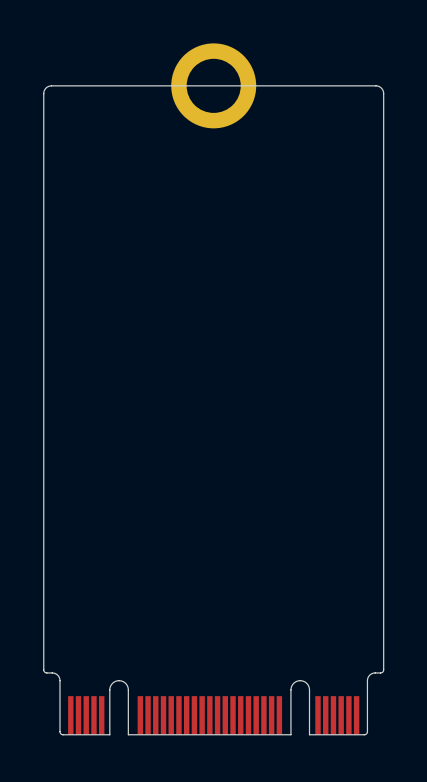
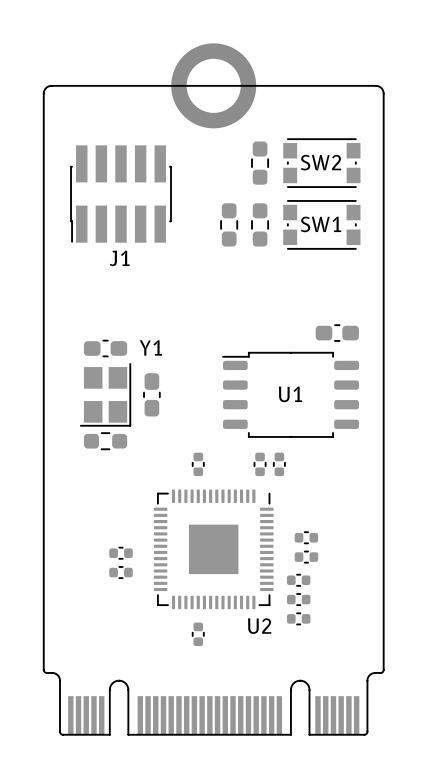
part: none -> (260, 163)
SW2: none -> (321, 163)
J1: none -> (121, 194)
part: none -> (229, 224)
part: none -> (260, 224)
SW1: none -> (321, 224)
part: none -> (337, 333)
part: none -> (105, 348)
Y1: none -> (105, 394)
part: none -> (151, 394)
U1: none -> (290, 394)
part: none -> (105, 441)
part: none -> (198, 464)
part: none -> (260, 464)
part: none -> (279, 464)
part: none -> (306, 537)
U2: none -> (213, 549)
part: none -> (121, 553)
part: none -> (306, 557)
part: none -> (121, 572)
part: none -> (298, 580)
part: none -> (298, 599)
part: none -> (298, 618)
part: none -> (198, 634)

